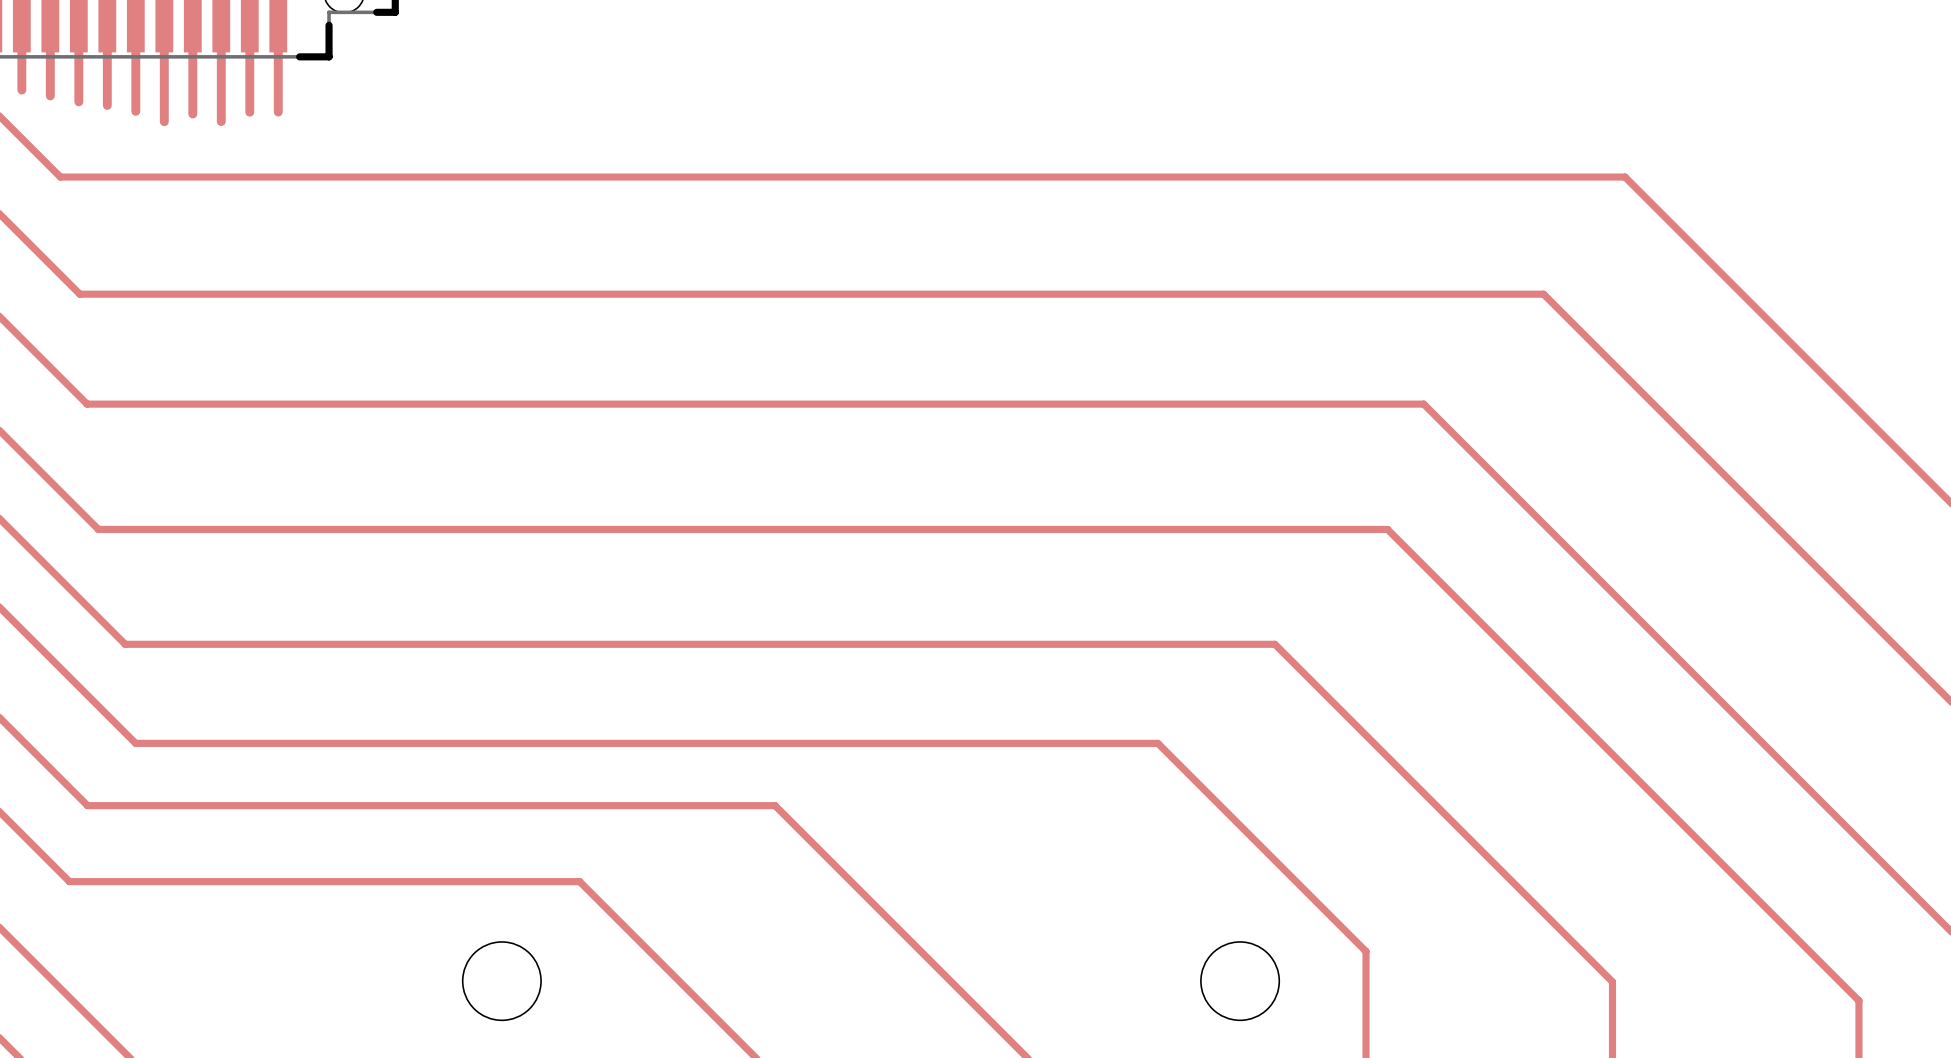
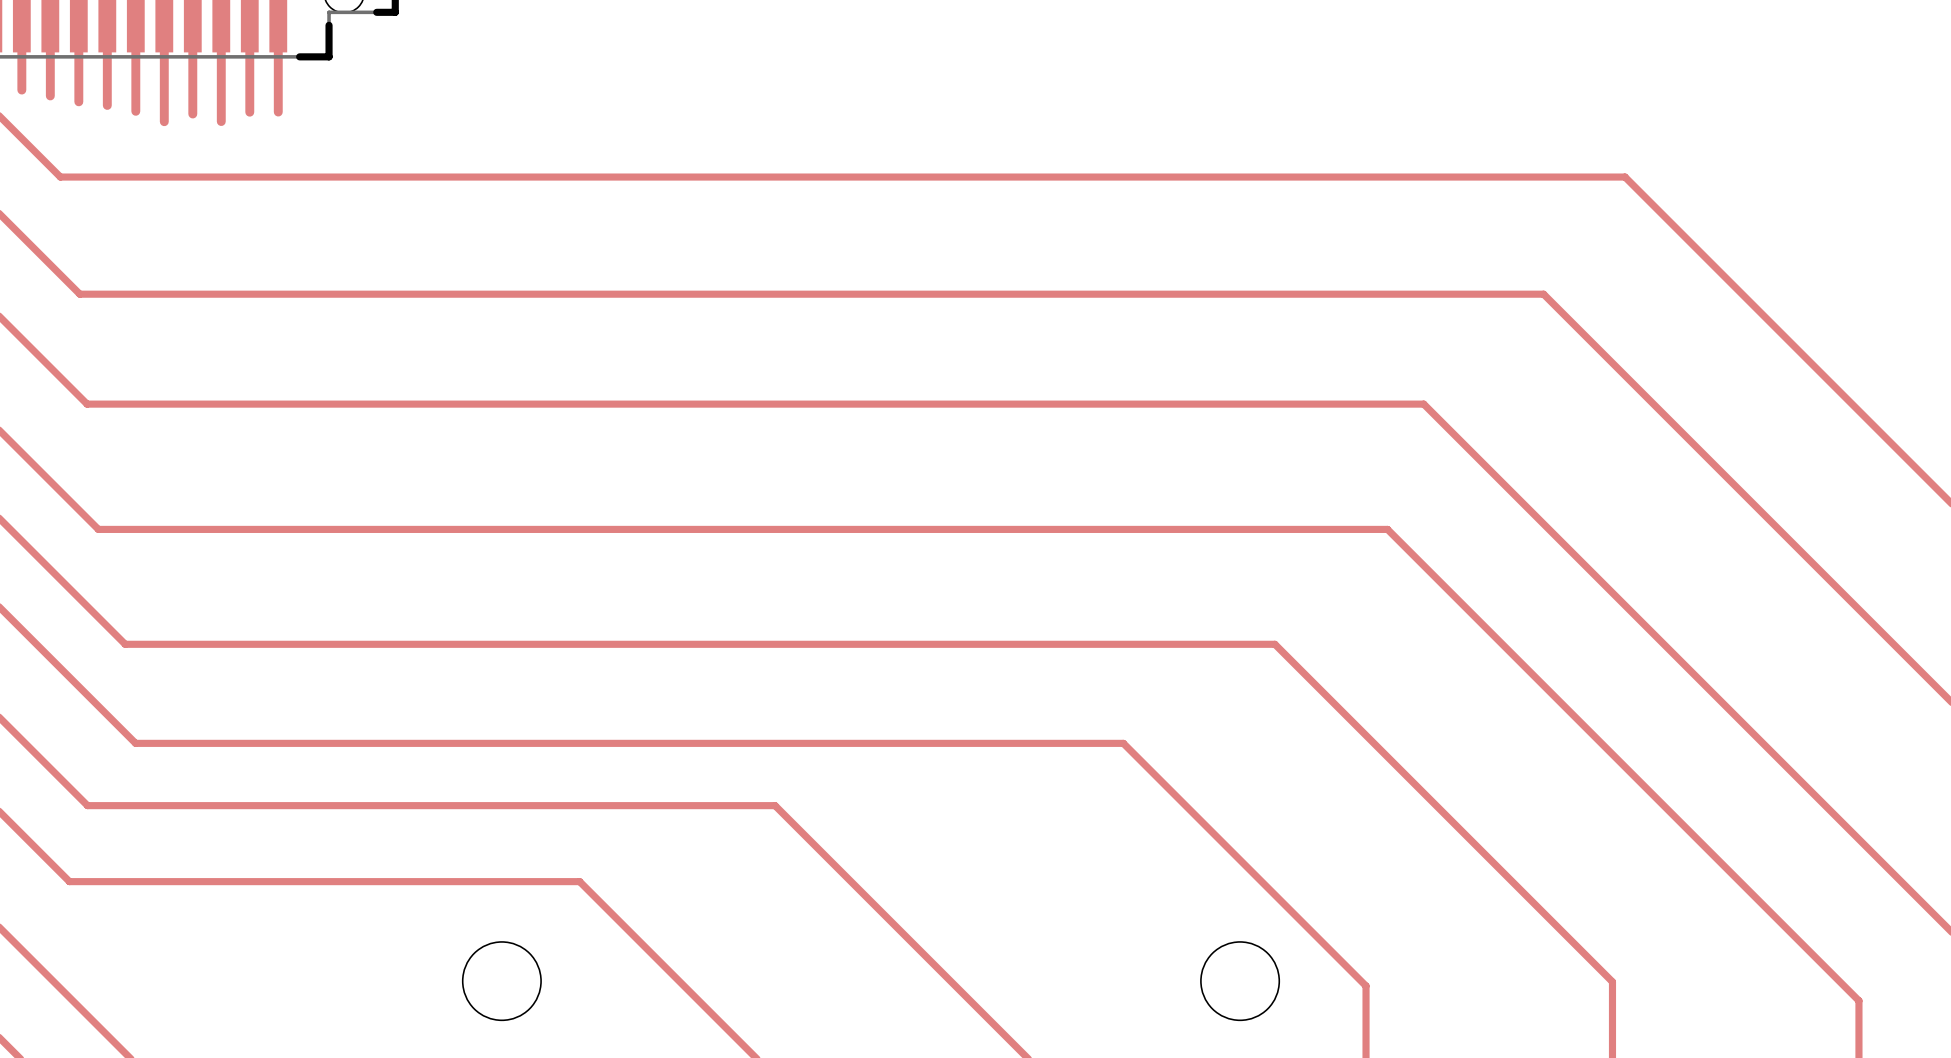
top track: (1123, 743) (1157, 743) (1366, 951) (1366, 985) -> (1123, 743) (1366, 985)

